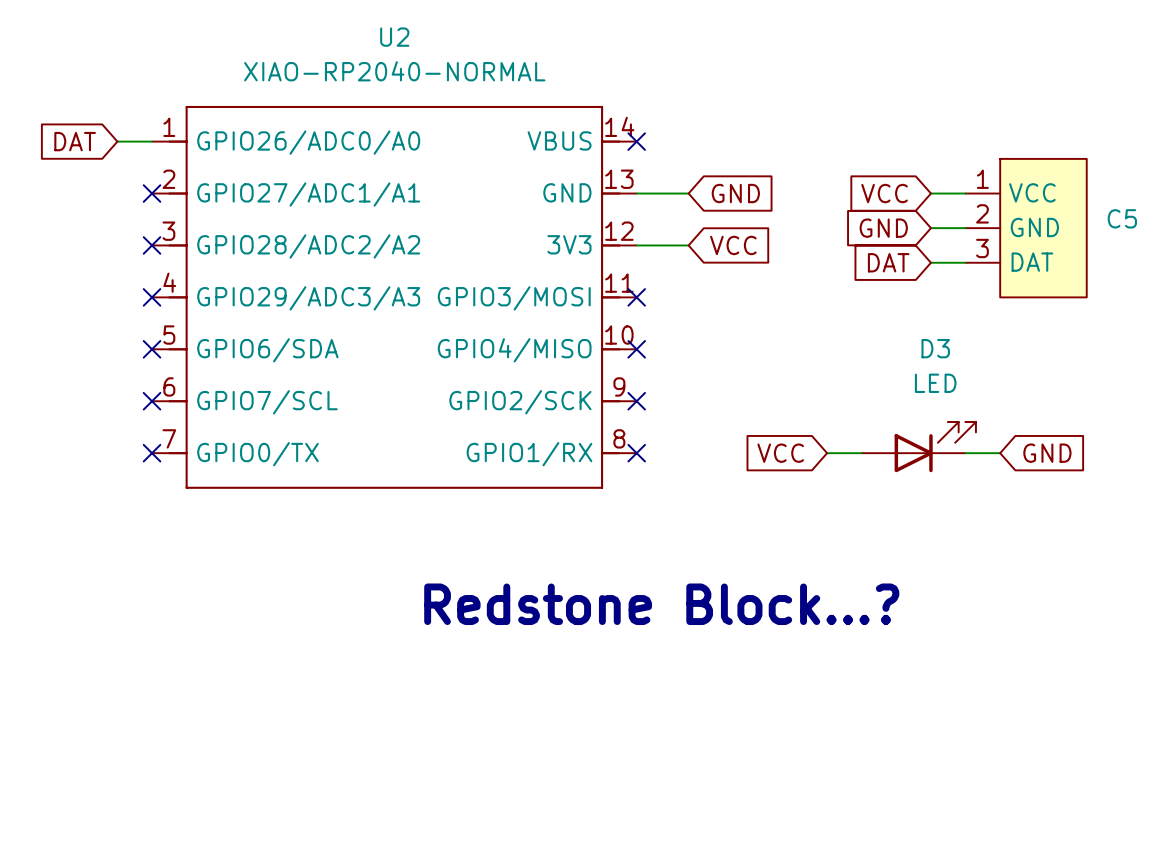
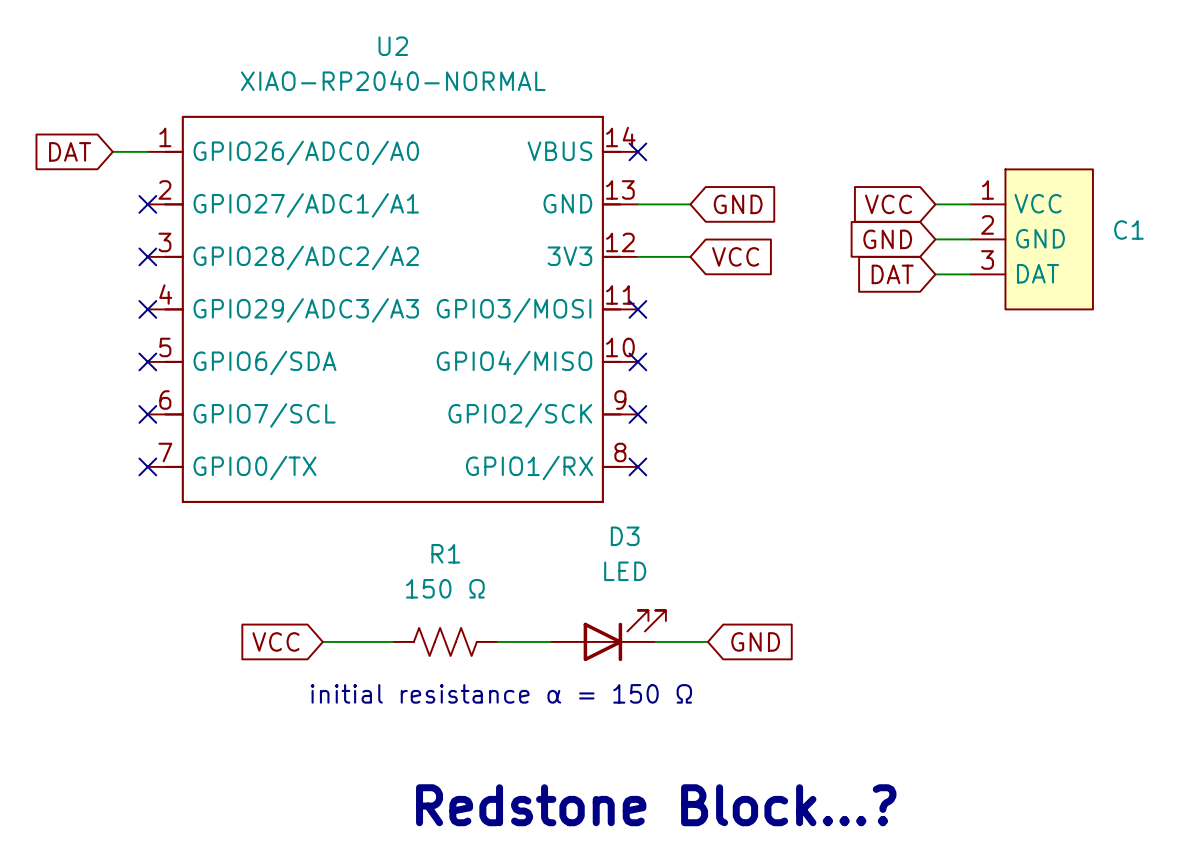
C5 name: C5 (1122, 218) -> C1 (1128, 229)
D3 position: (918, 447) -> (608, 635)
global label: VCC (780, 453) -> none
wire: (827, 453) (861, 453) -> none
wire: (965, 453) (1000, 453) -> none
global label: GND (1047, 453) -> none
text position: Redstone Block...? (661, 604) -> Redstone Block...? (656, 805)
global label: none -> VCC (275, 641)
wire: none -> (322, 641) (392, 641)
R1: none -> 150 Ω (445, 641)
wire: none -> (497, 641) (550, 641)
wire: none -> (655, 641) (707, 641)
global label: none -> GND (755, 641)
text: none -> initial resistance α = 150 Ω (501, 693)

